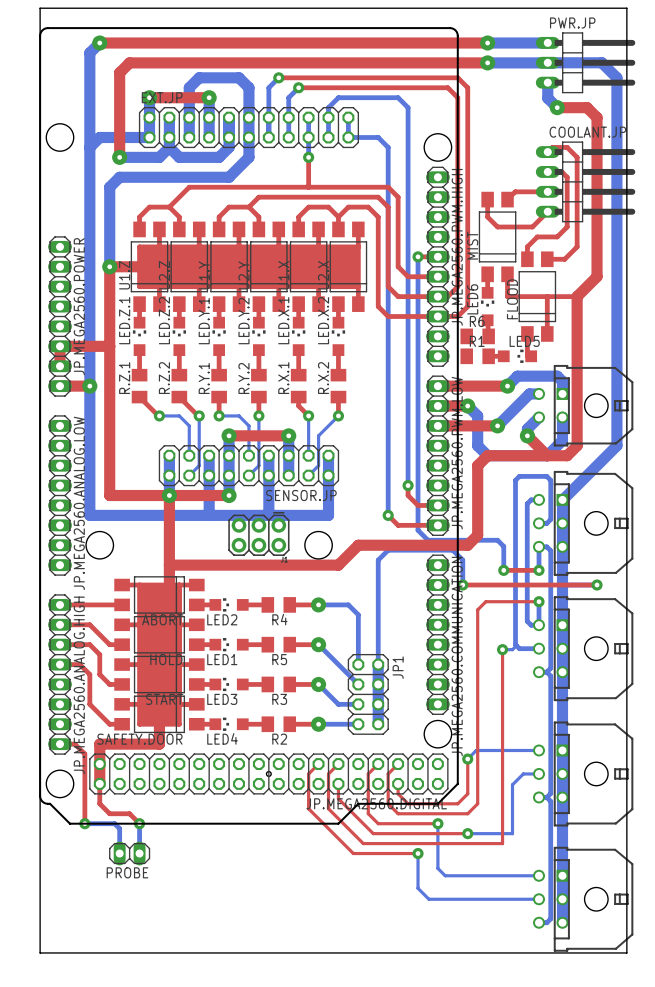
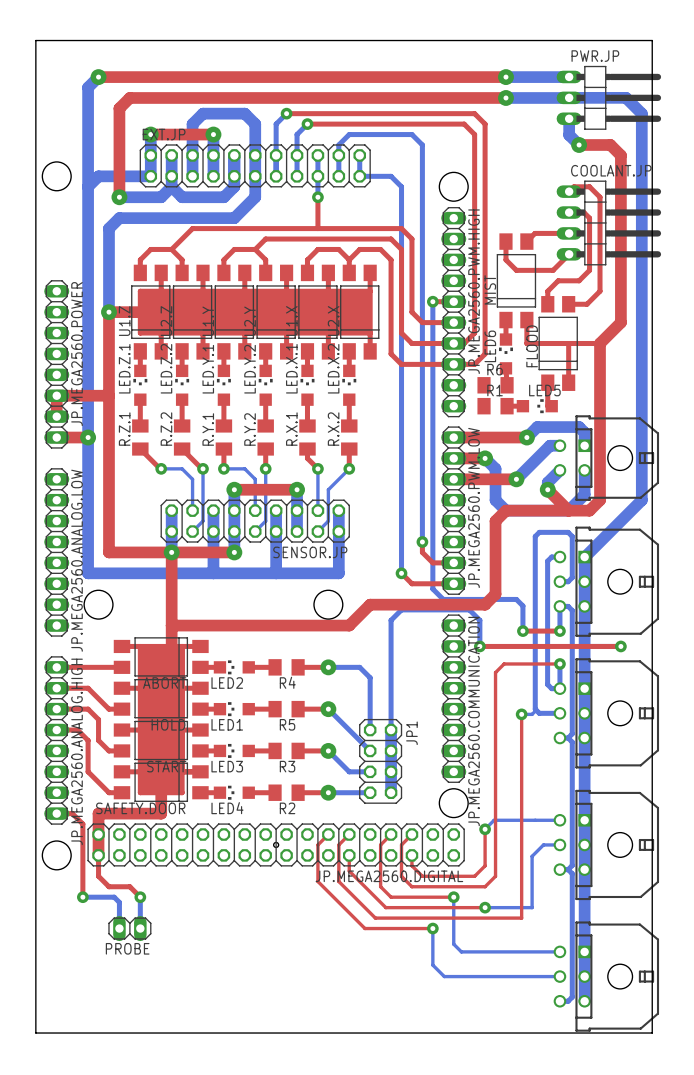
board edge: (47, 28) (449, 28) (456, 32) (457, 783) (437, 803) (358, 803) (338, 823) (69, 823) (50, 803) (44, 803) (41, 799) (40, 35) (42, 30) (47, 28) -> none
part: (258, 533) -> none

